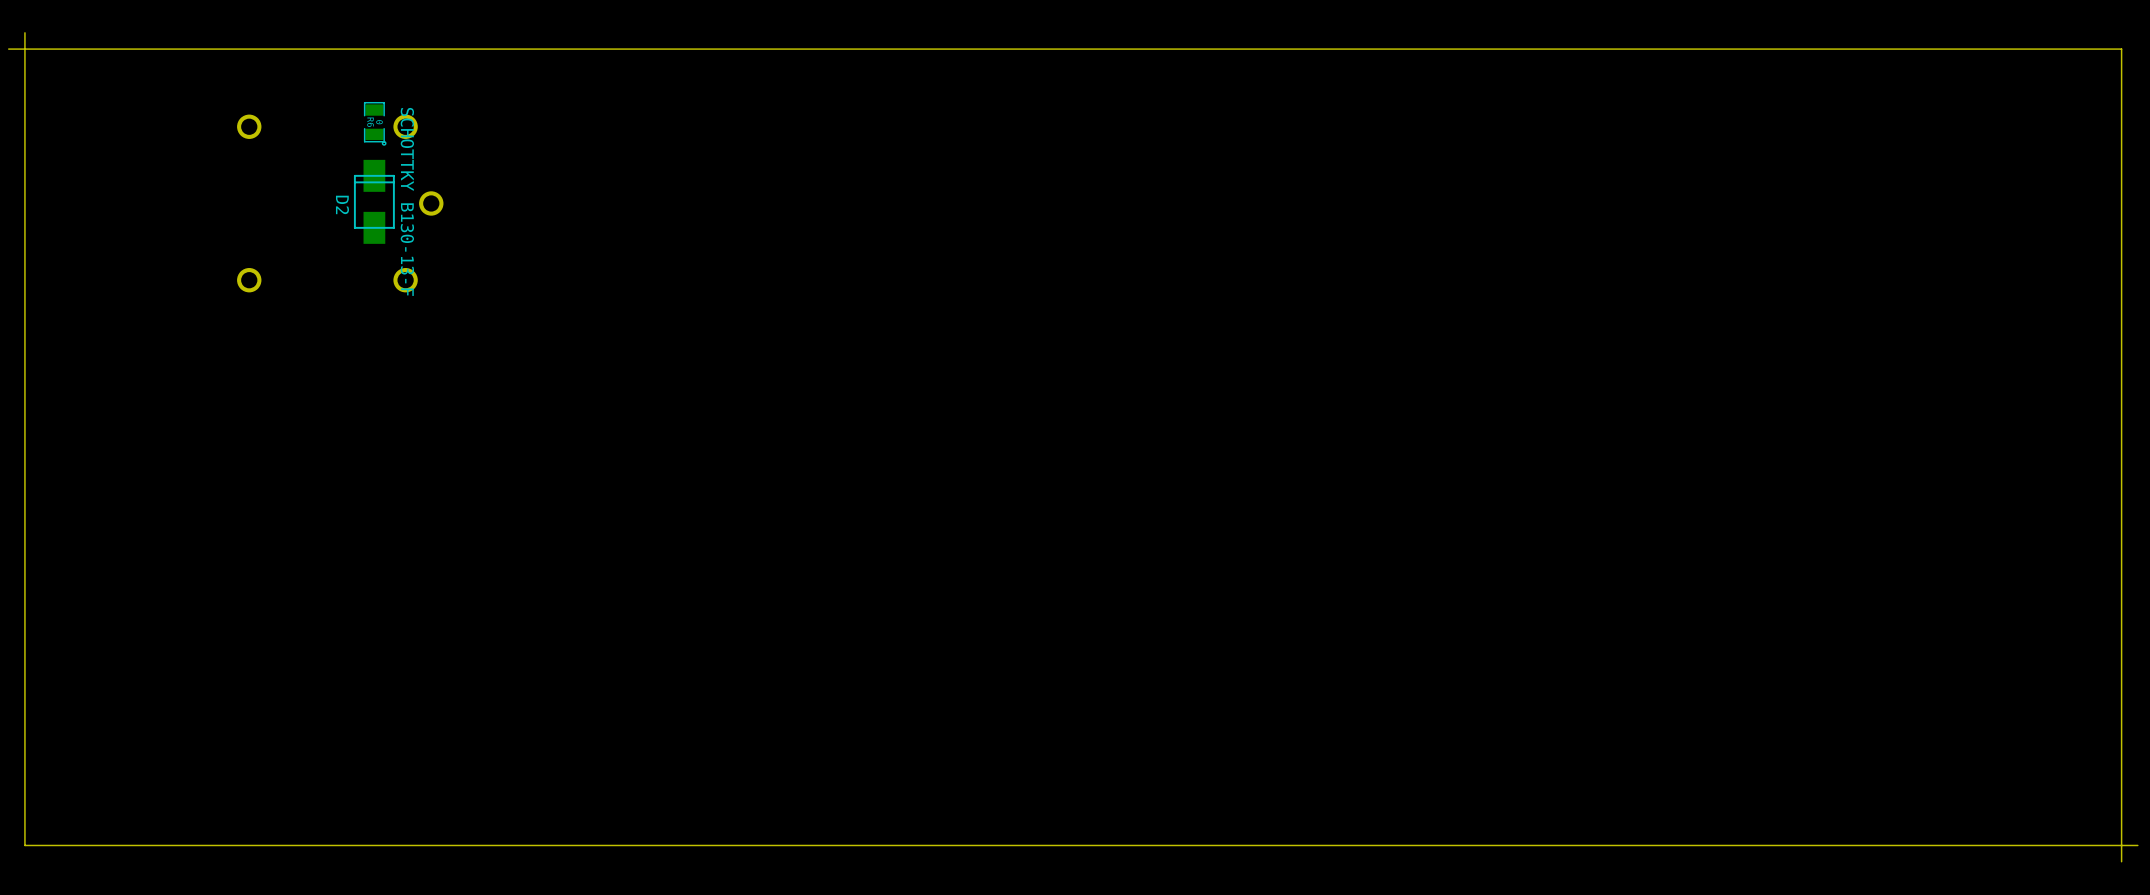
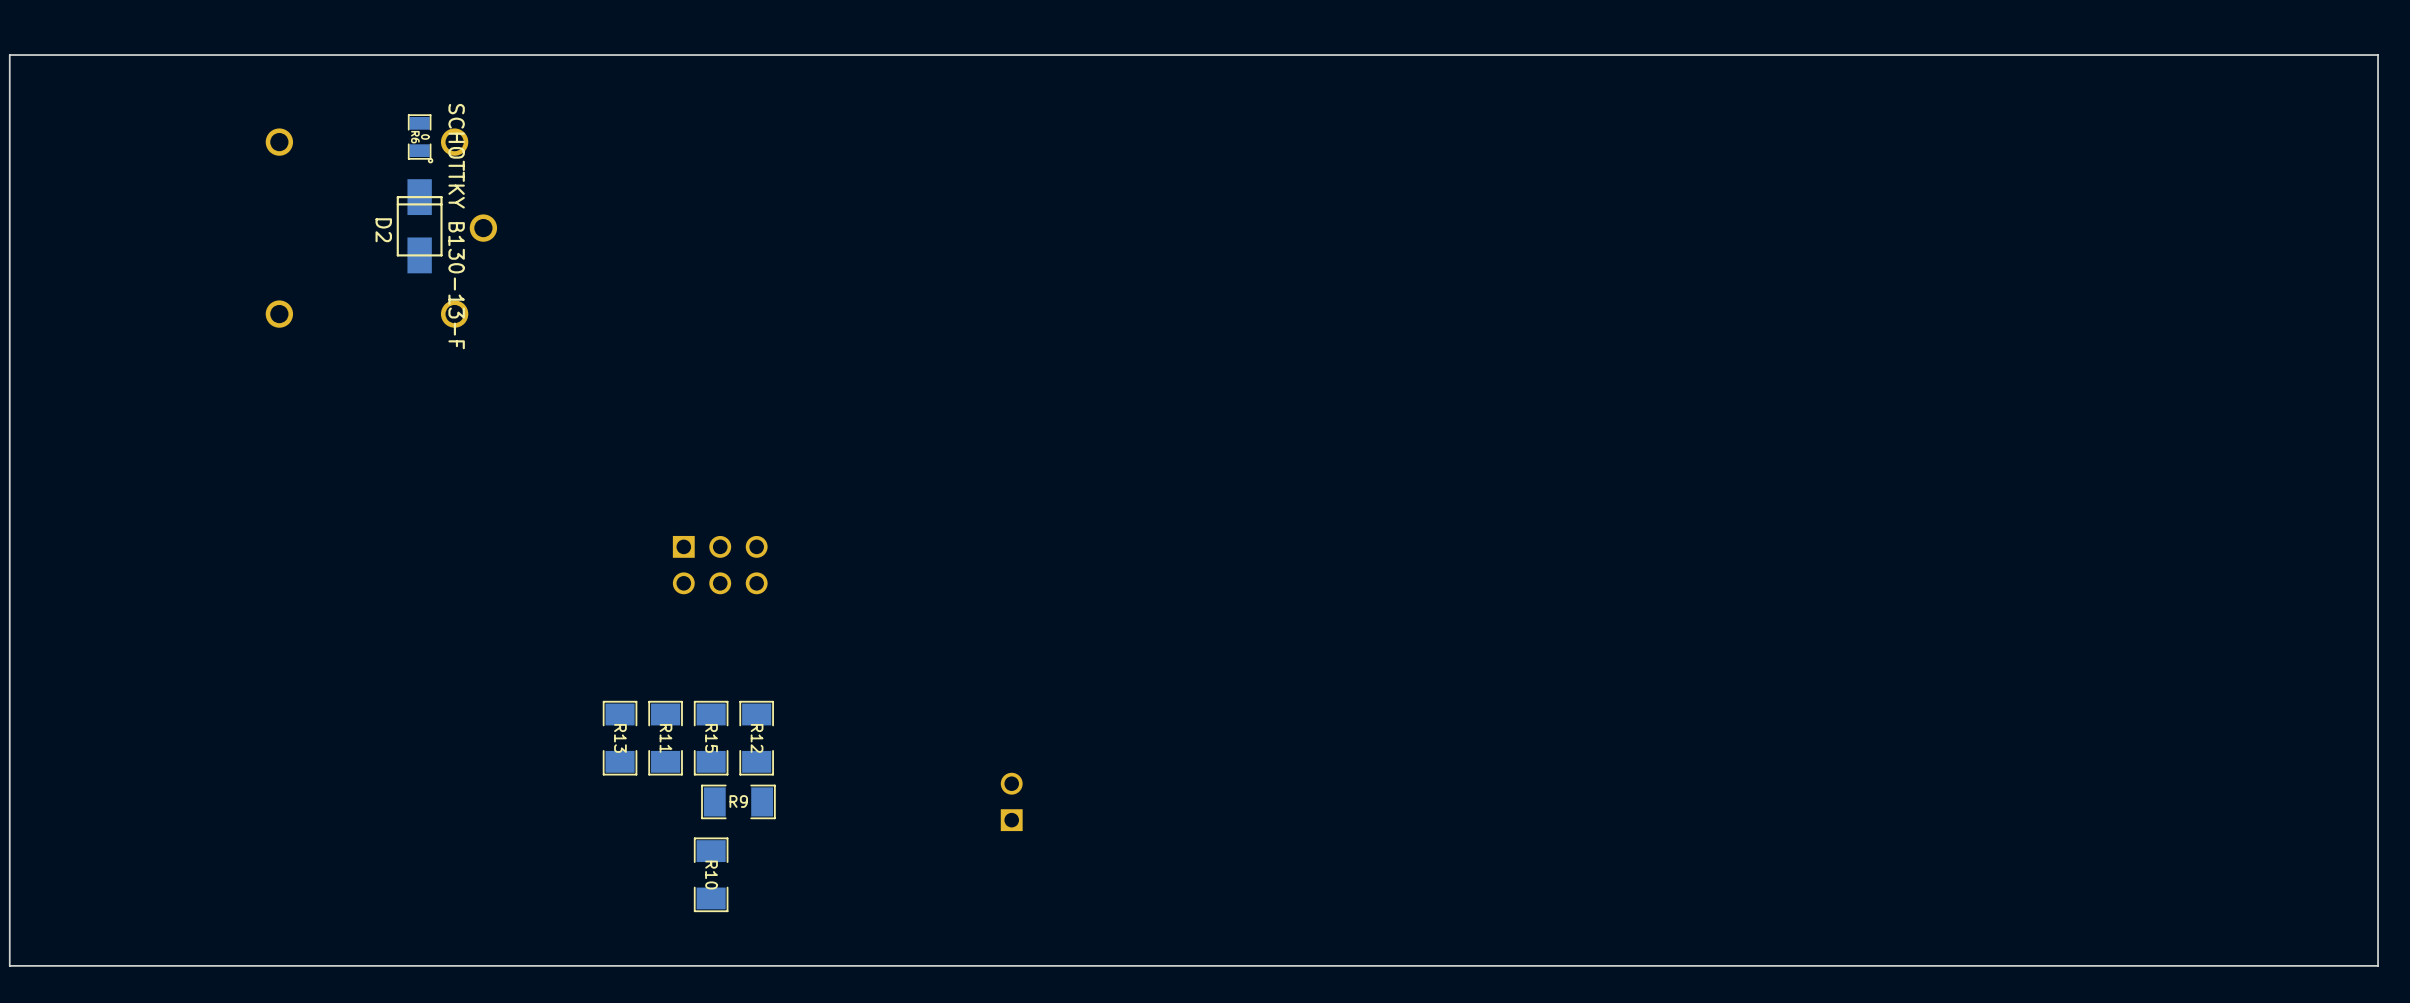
board edge: (24, 32) (24, 845) (2137, 845) -> (9, 55) (9, 965) (2378, 965)
part: none -> (720, 565)
R13: none -> (620, 738)
R11: none -> (665, 738)
R15: none -> (711, 738)
R12: none -> (756, 738)
R9: none -> (738, 801)
part: none -> (1011, 801)
R10: none -> (711, 874)

